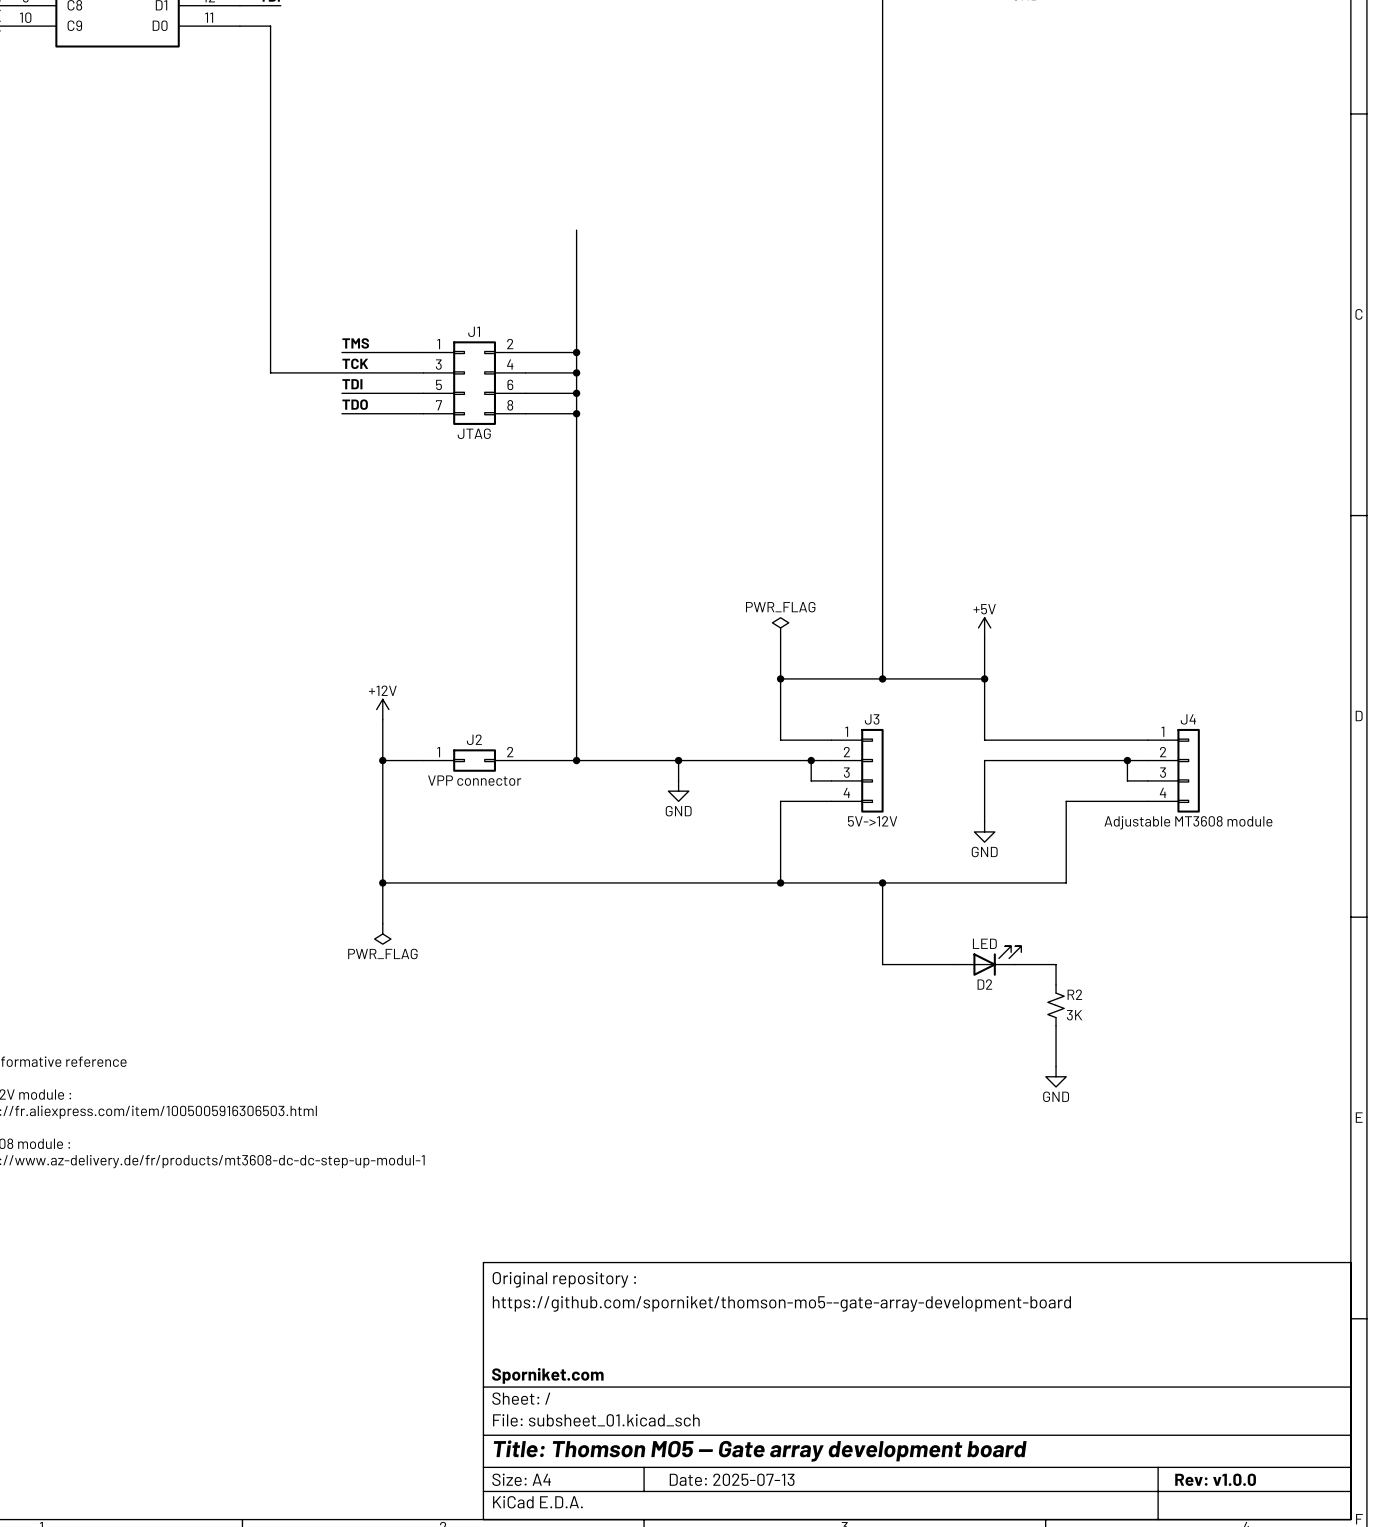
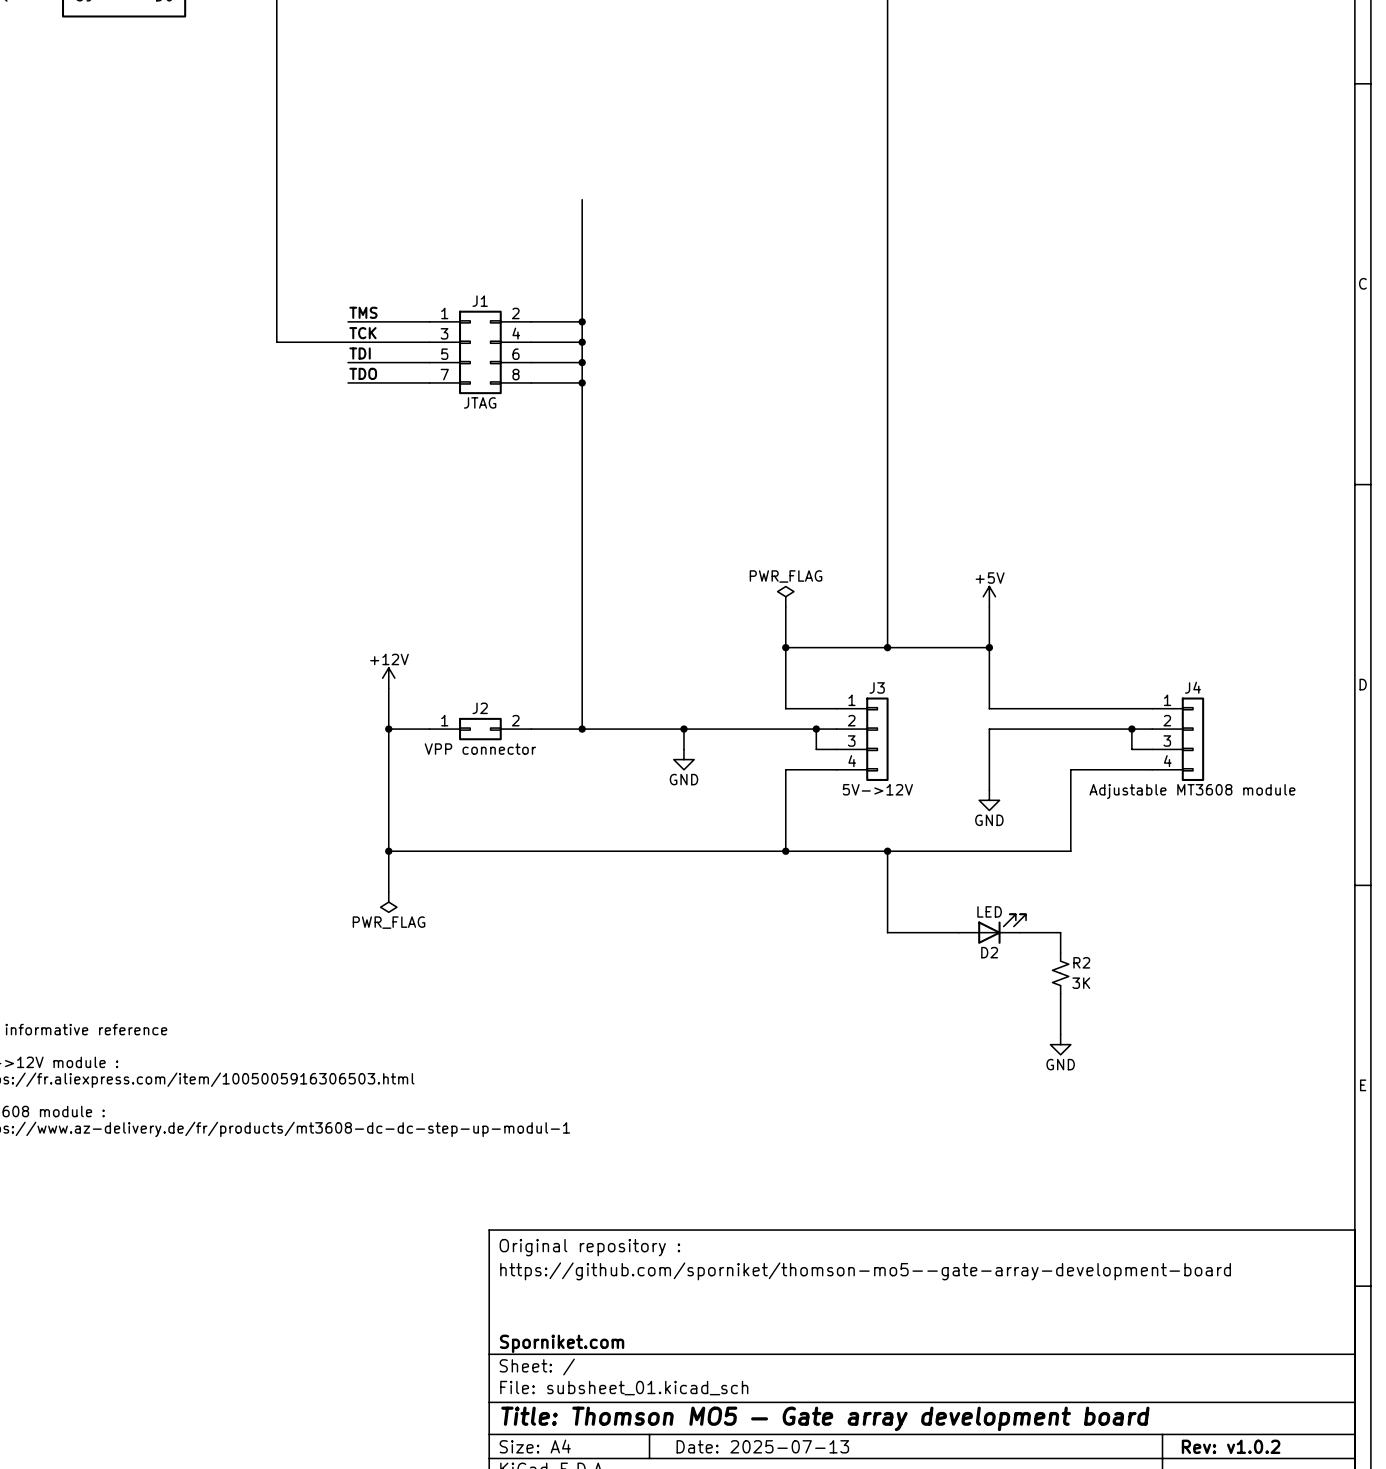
title block: Rev: v1.0.0 (1215, 1479) -> Rev: v1.0.2 (1231, 1446)

